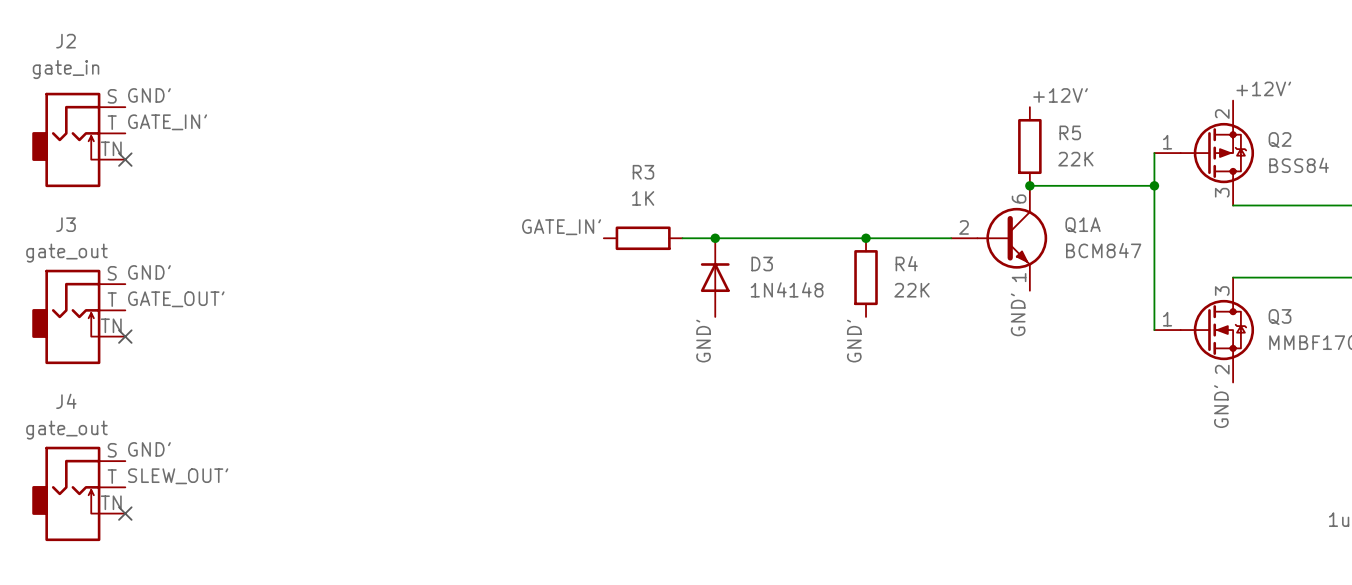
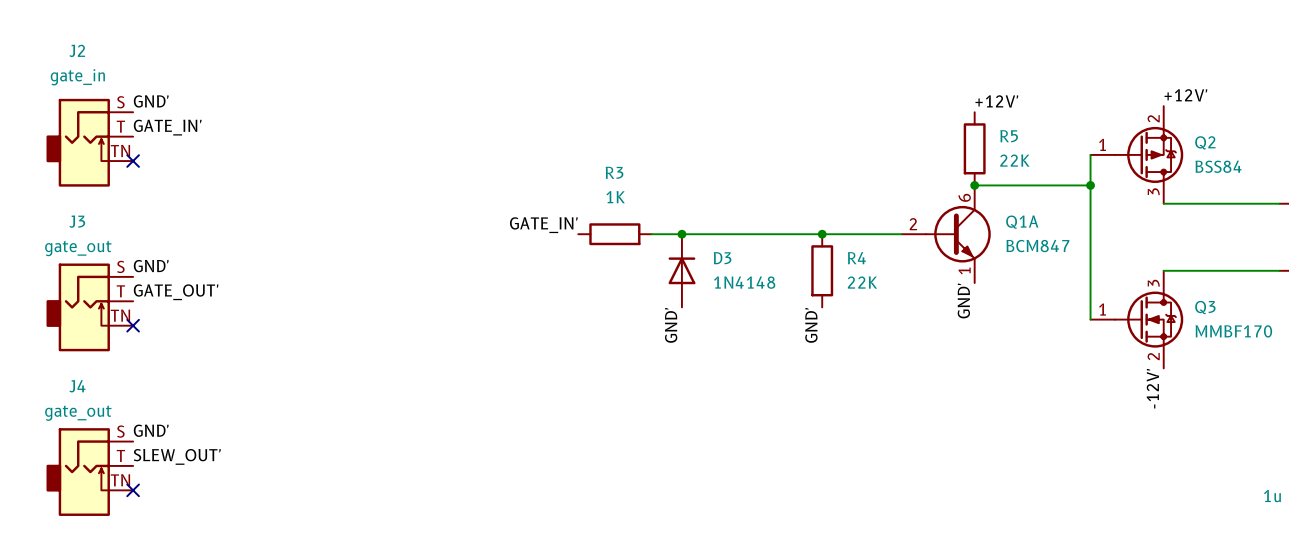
label: GND' (1221, 406) -> -12V' (1152, 388)

